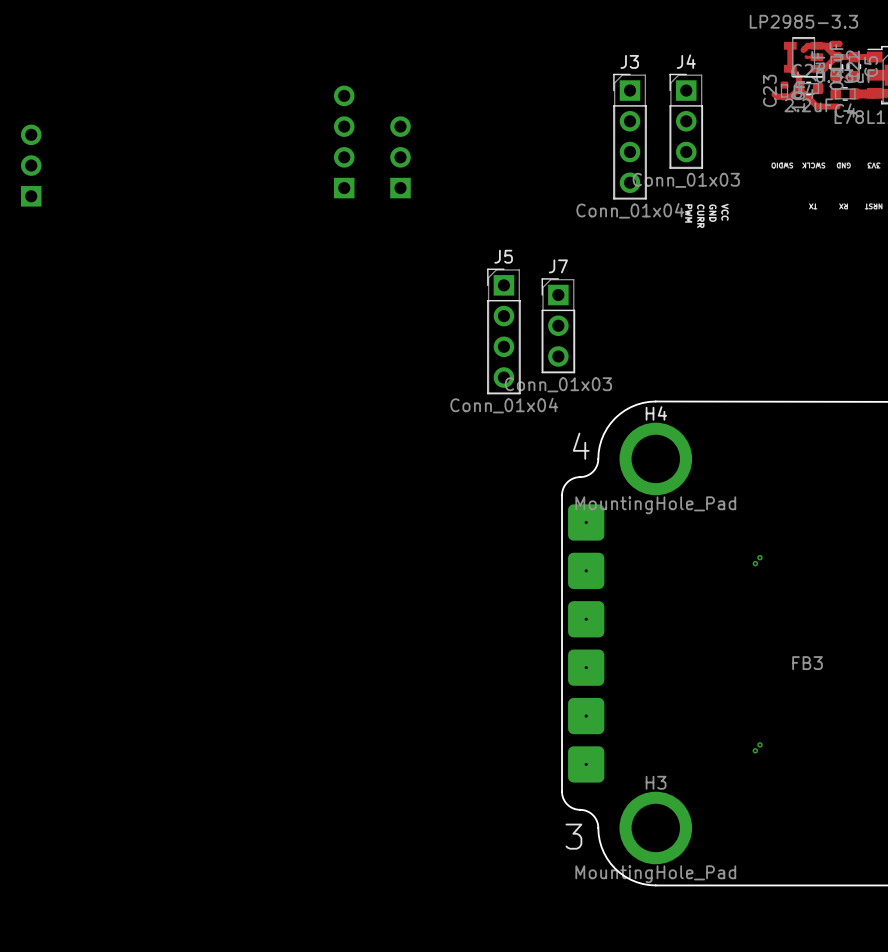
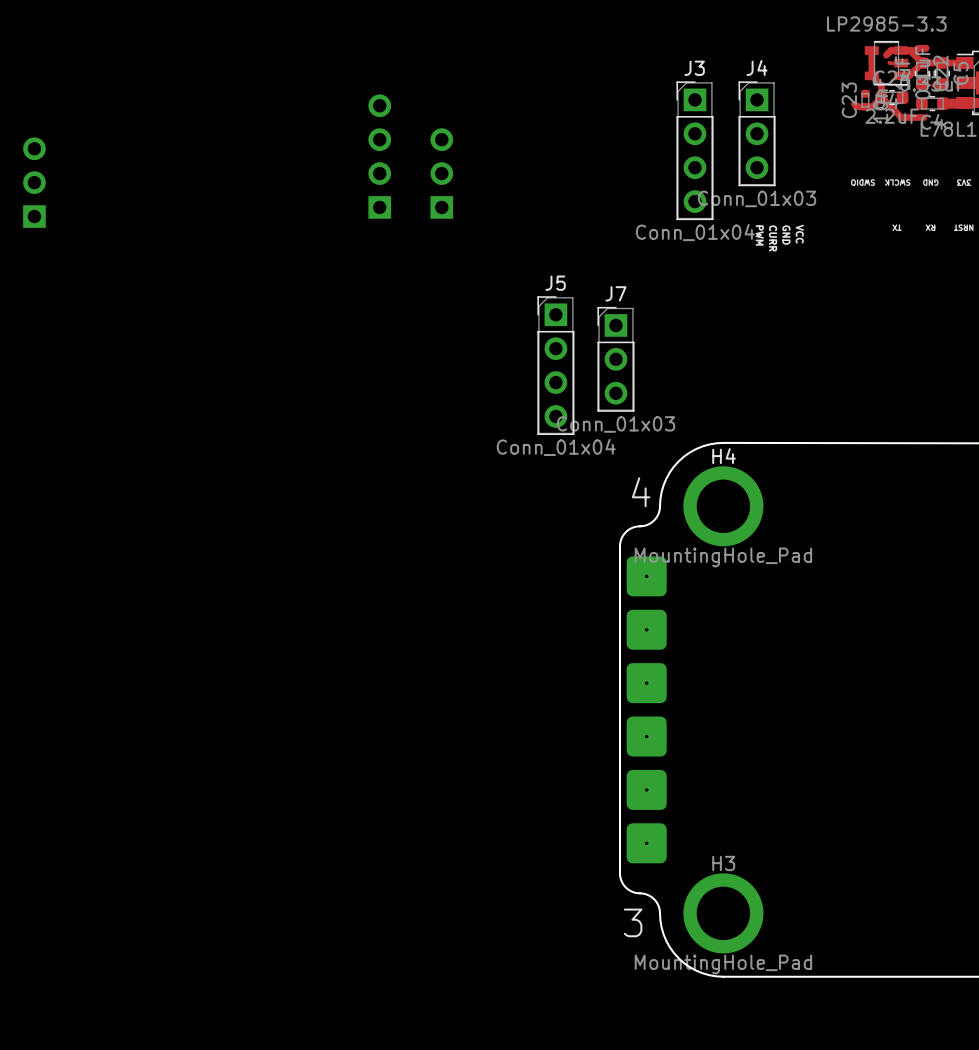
via: (759, 557) -> none
via: (755, 563) -> none
FB3: (807, 663) -> none
via: (759, 744) -> none
via: (755, 750) -> none

